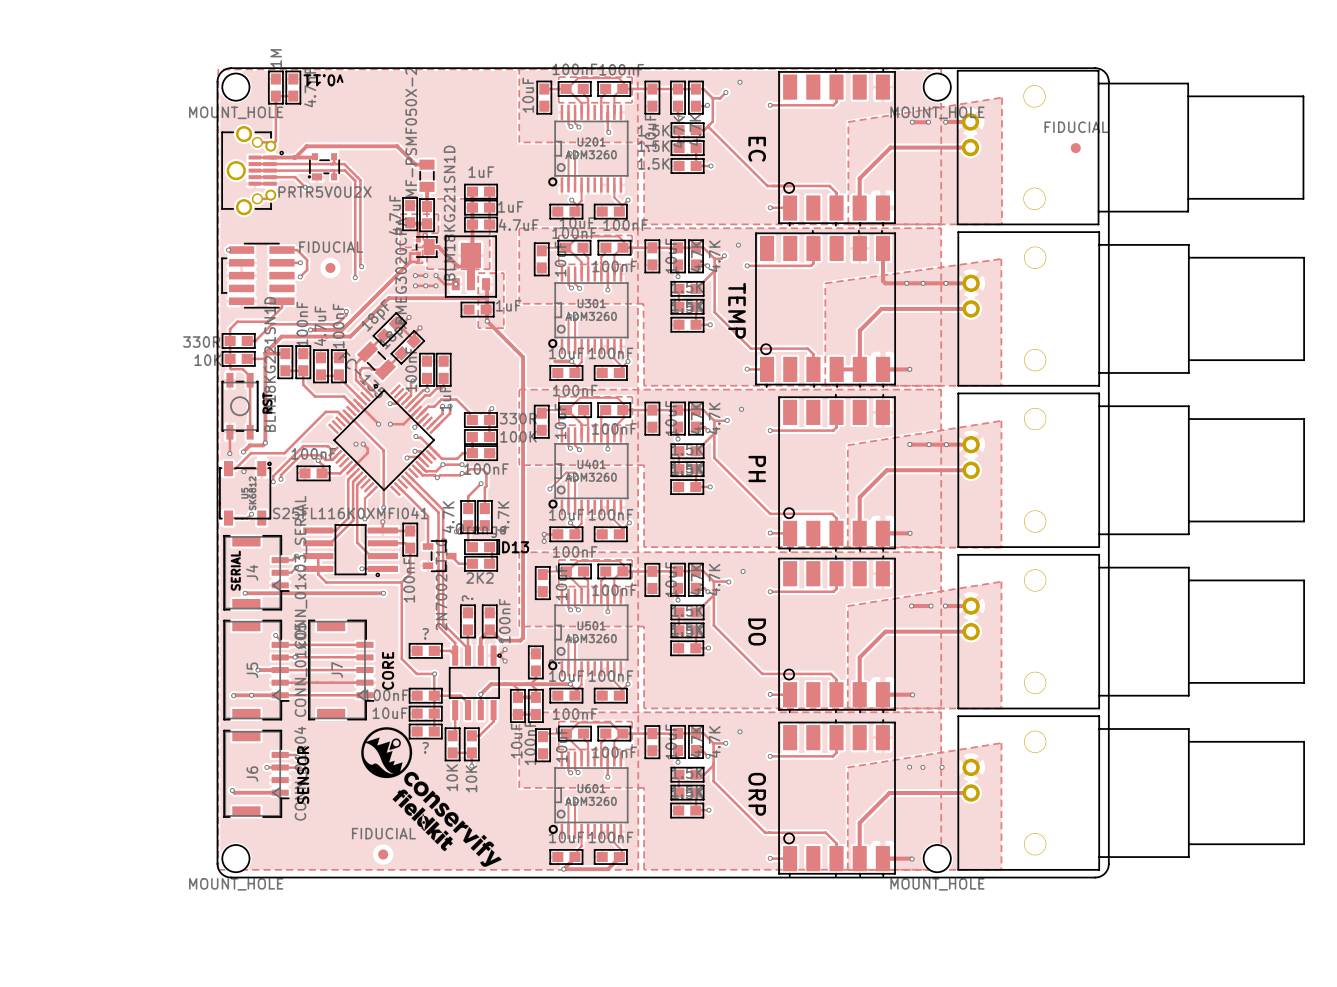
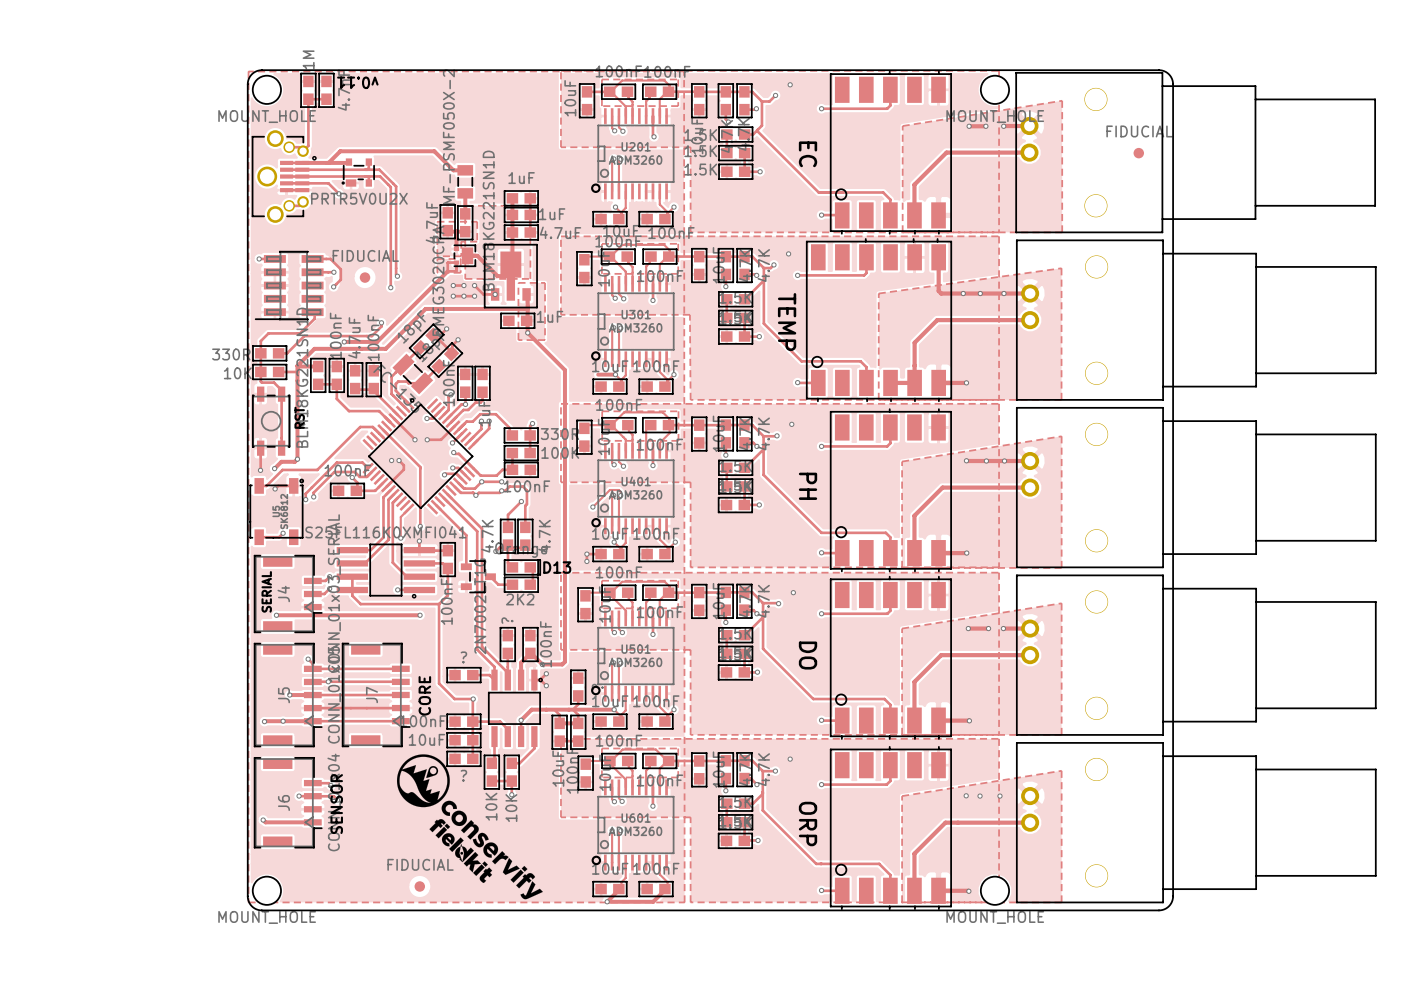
part footprint: [221, 242, 295, 309] -> [255, 251, 324, 321]

